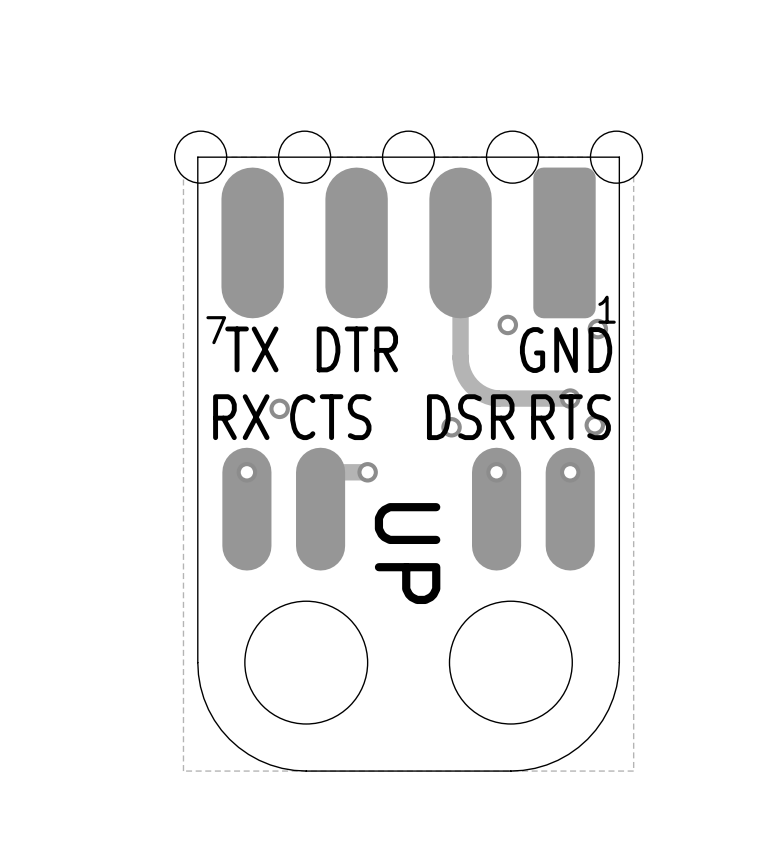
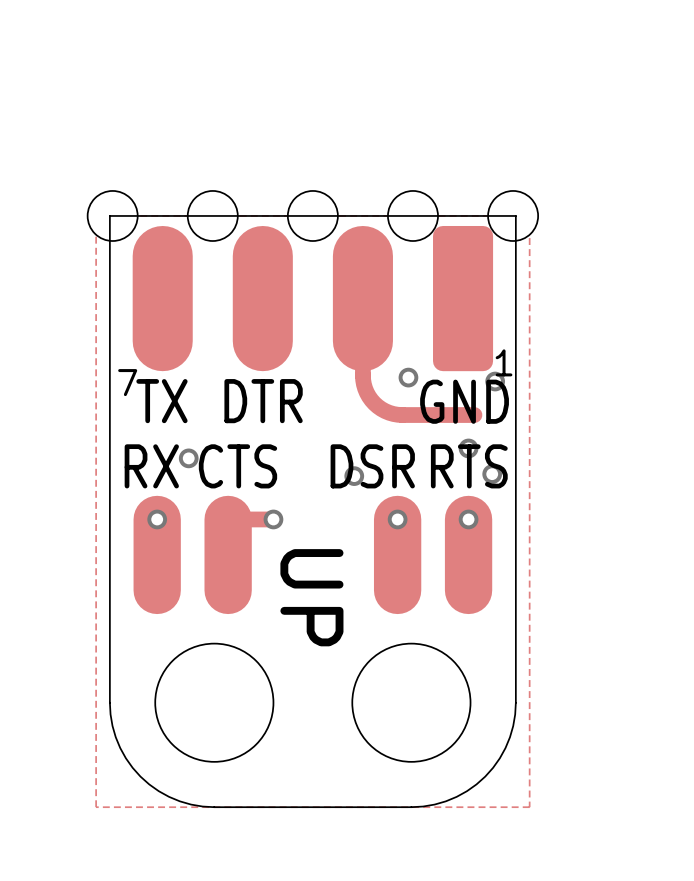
track: (460, 322) (461, 367) (468, 381) (478, 391) (497, 398) (570, 398) -> (362, 375) (365, 388) (371, 400) (389, 412) (402, 415) (474, 415)

